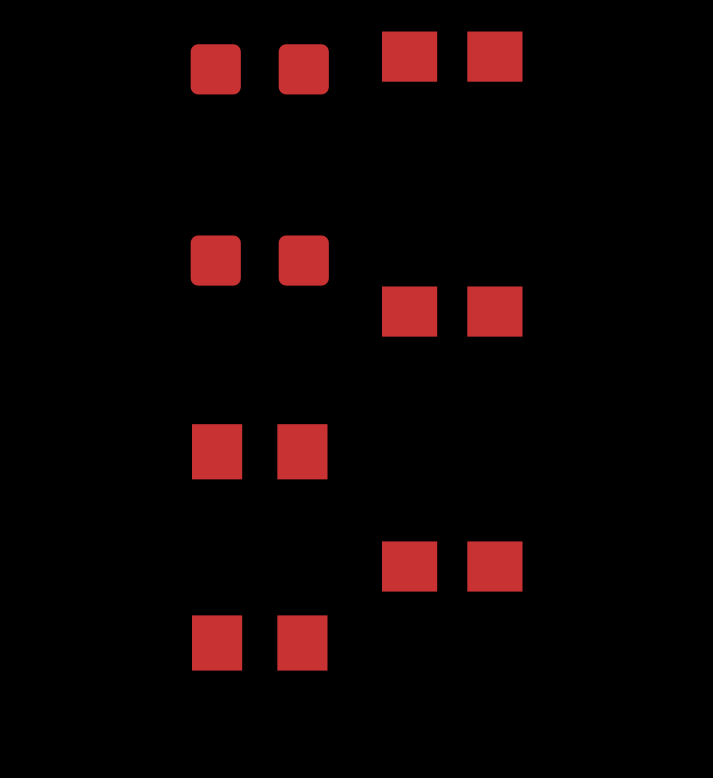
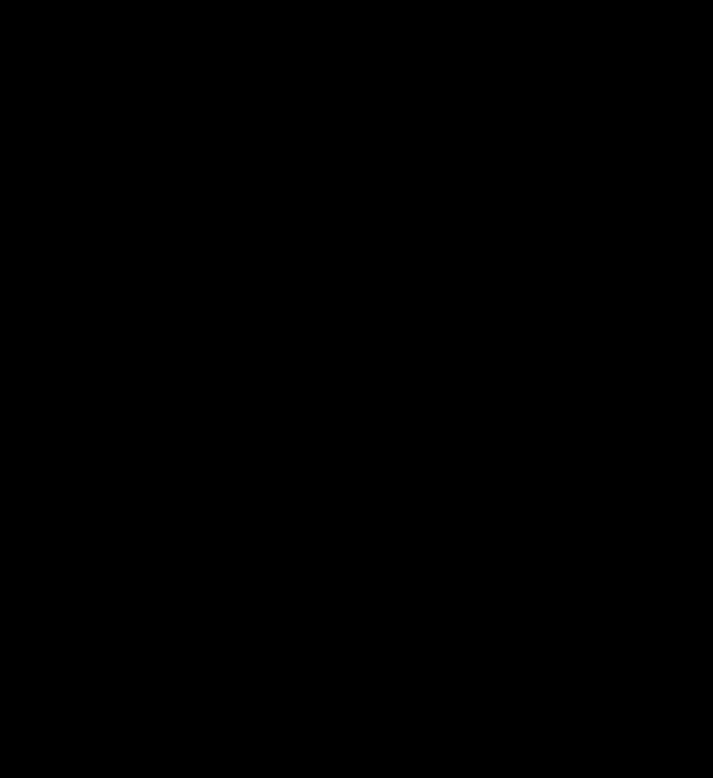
part: (452, 56) -> none
part: (259, 69) -> none
part: (259, 260) -> none
part: (452, 311) -> none
part: (259, 451) -> none
part: (452, 566) -> none
part: (259, 642) -> none

